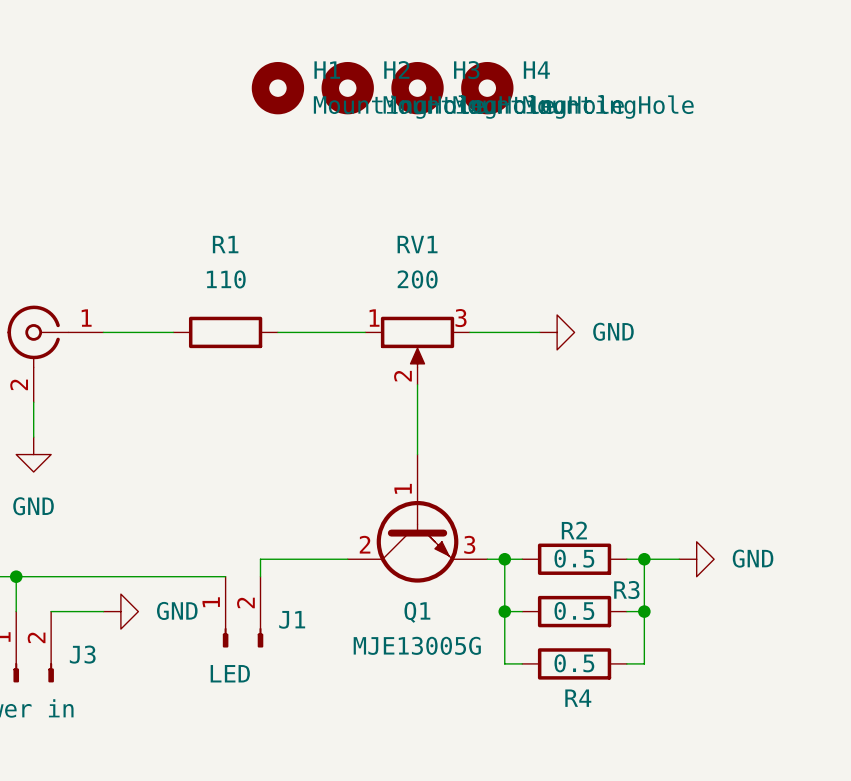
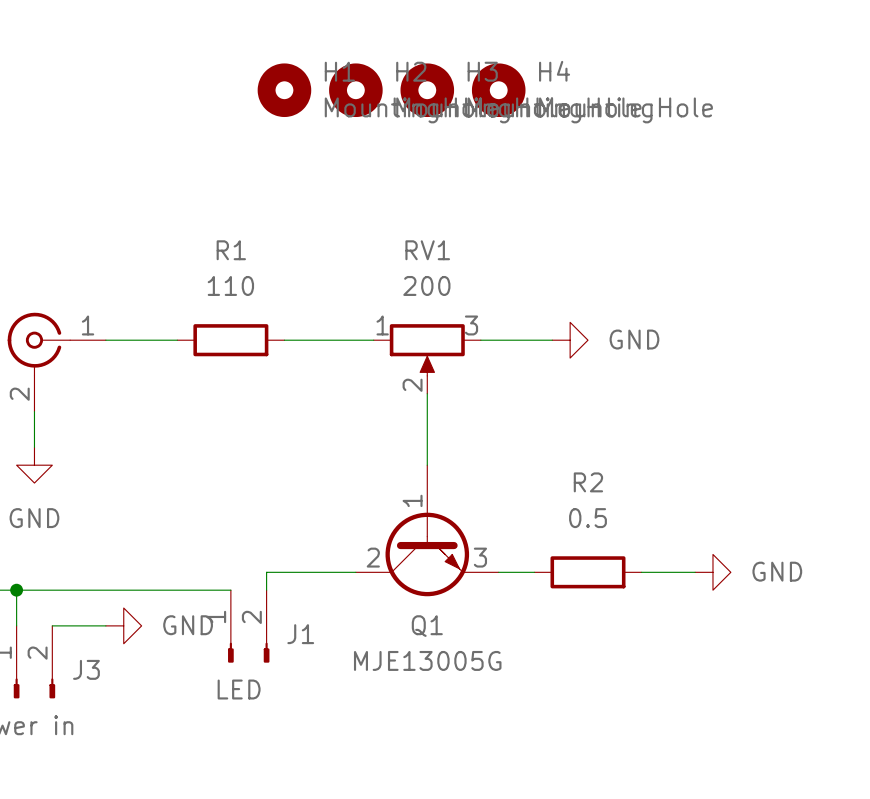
R2 name position: R2 (574, 530) -> R2 (588, 482)
R2 value position: 0.5 (574, 558) -> 0.5 (587, 518)
wire: (504, 559) (504, 663) (522, 663) -> none
junction: (504, 559) -> none
wire: (644, 559) (644, 663) (626, 663) -> none
junction: (644, 559) -> none
wire: (504, 611) (522, 611) -> none
junction: (504, 611) -> none
R3: 0.5 (574, 611) -> none
wire: (626, 611) (644, 611) -> none
junction: (644, 611) -> none
R4: 0.5 (574, 663) -> none

